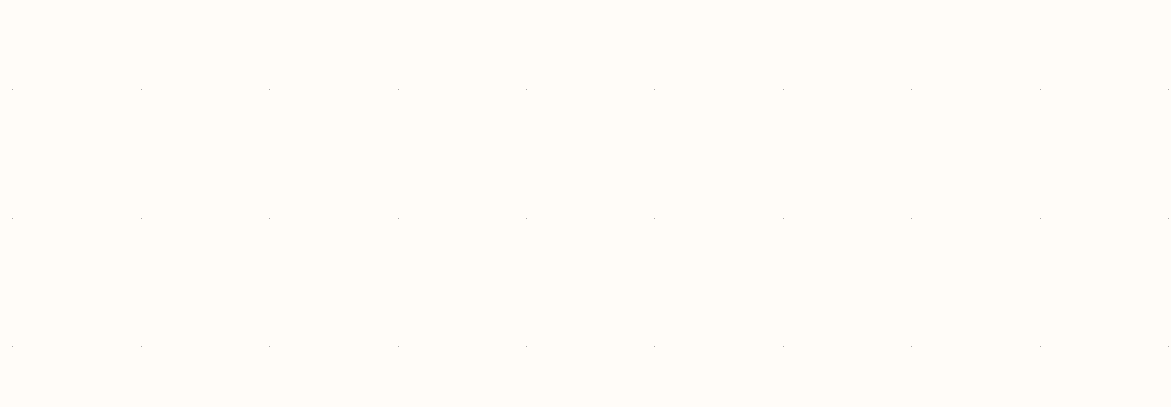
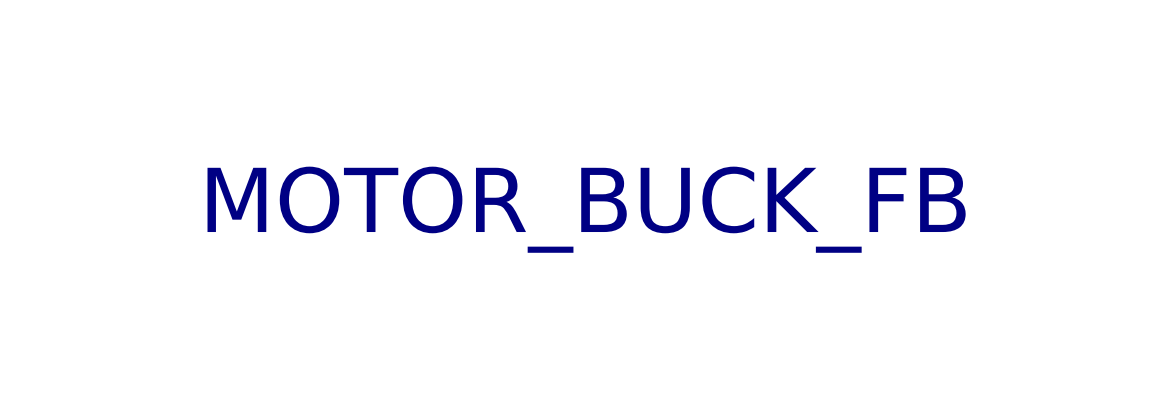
text: none -> MOTOR_BUCK_FB (586, 209)

